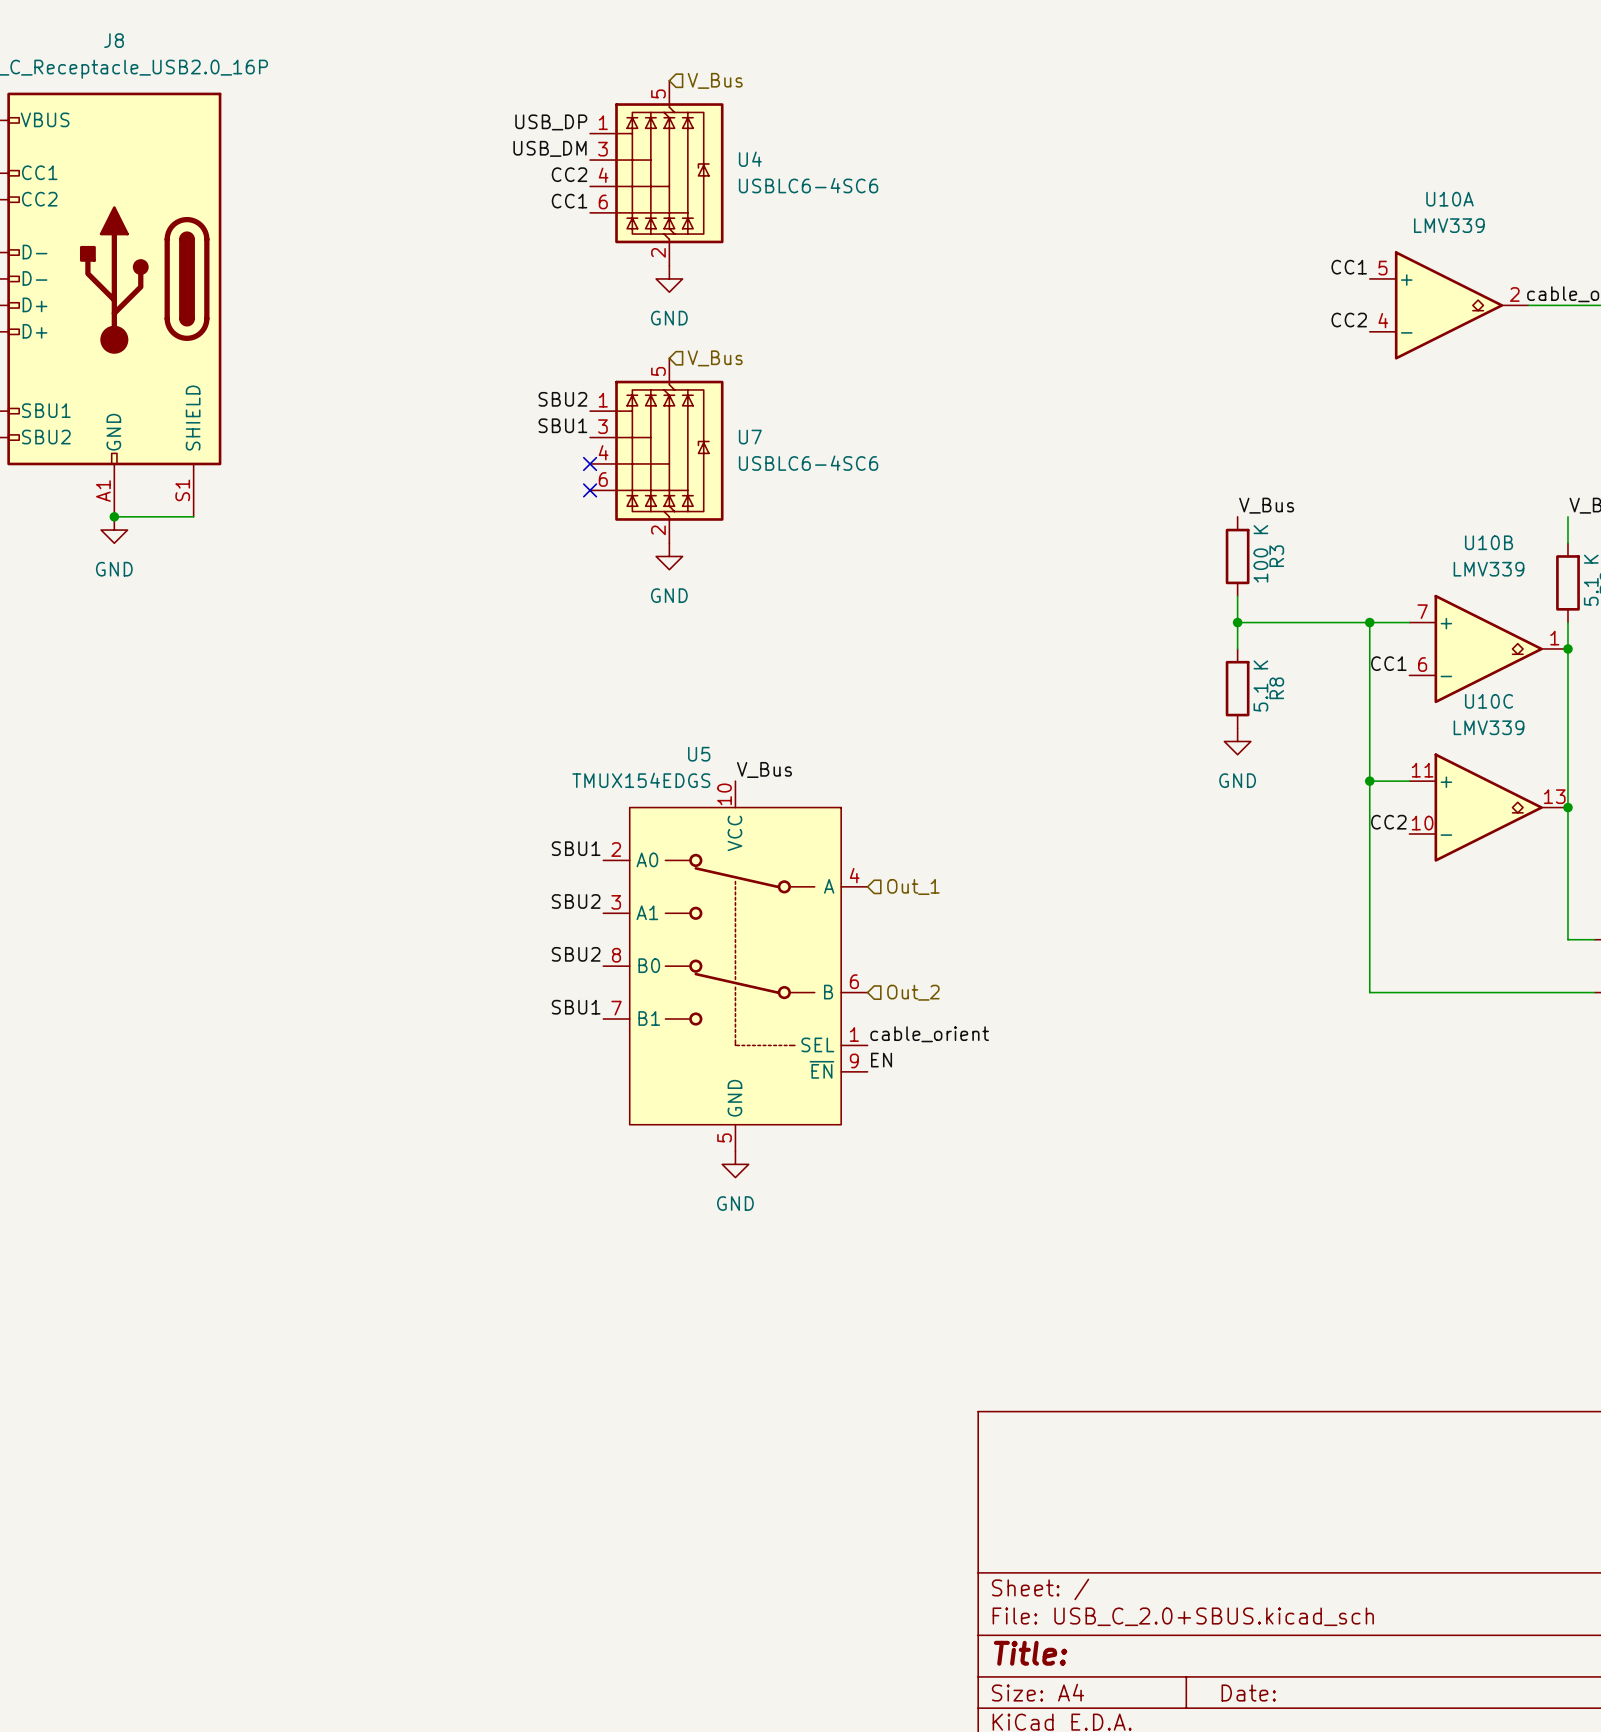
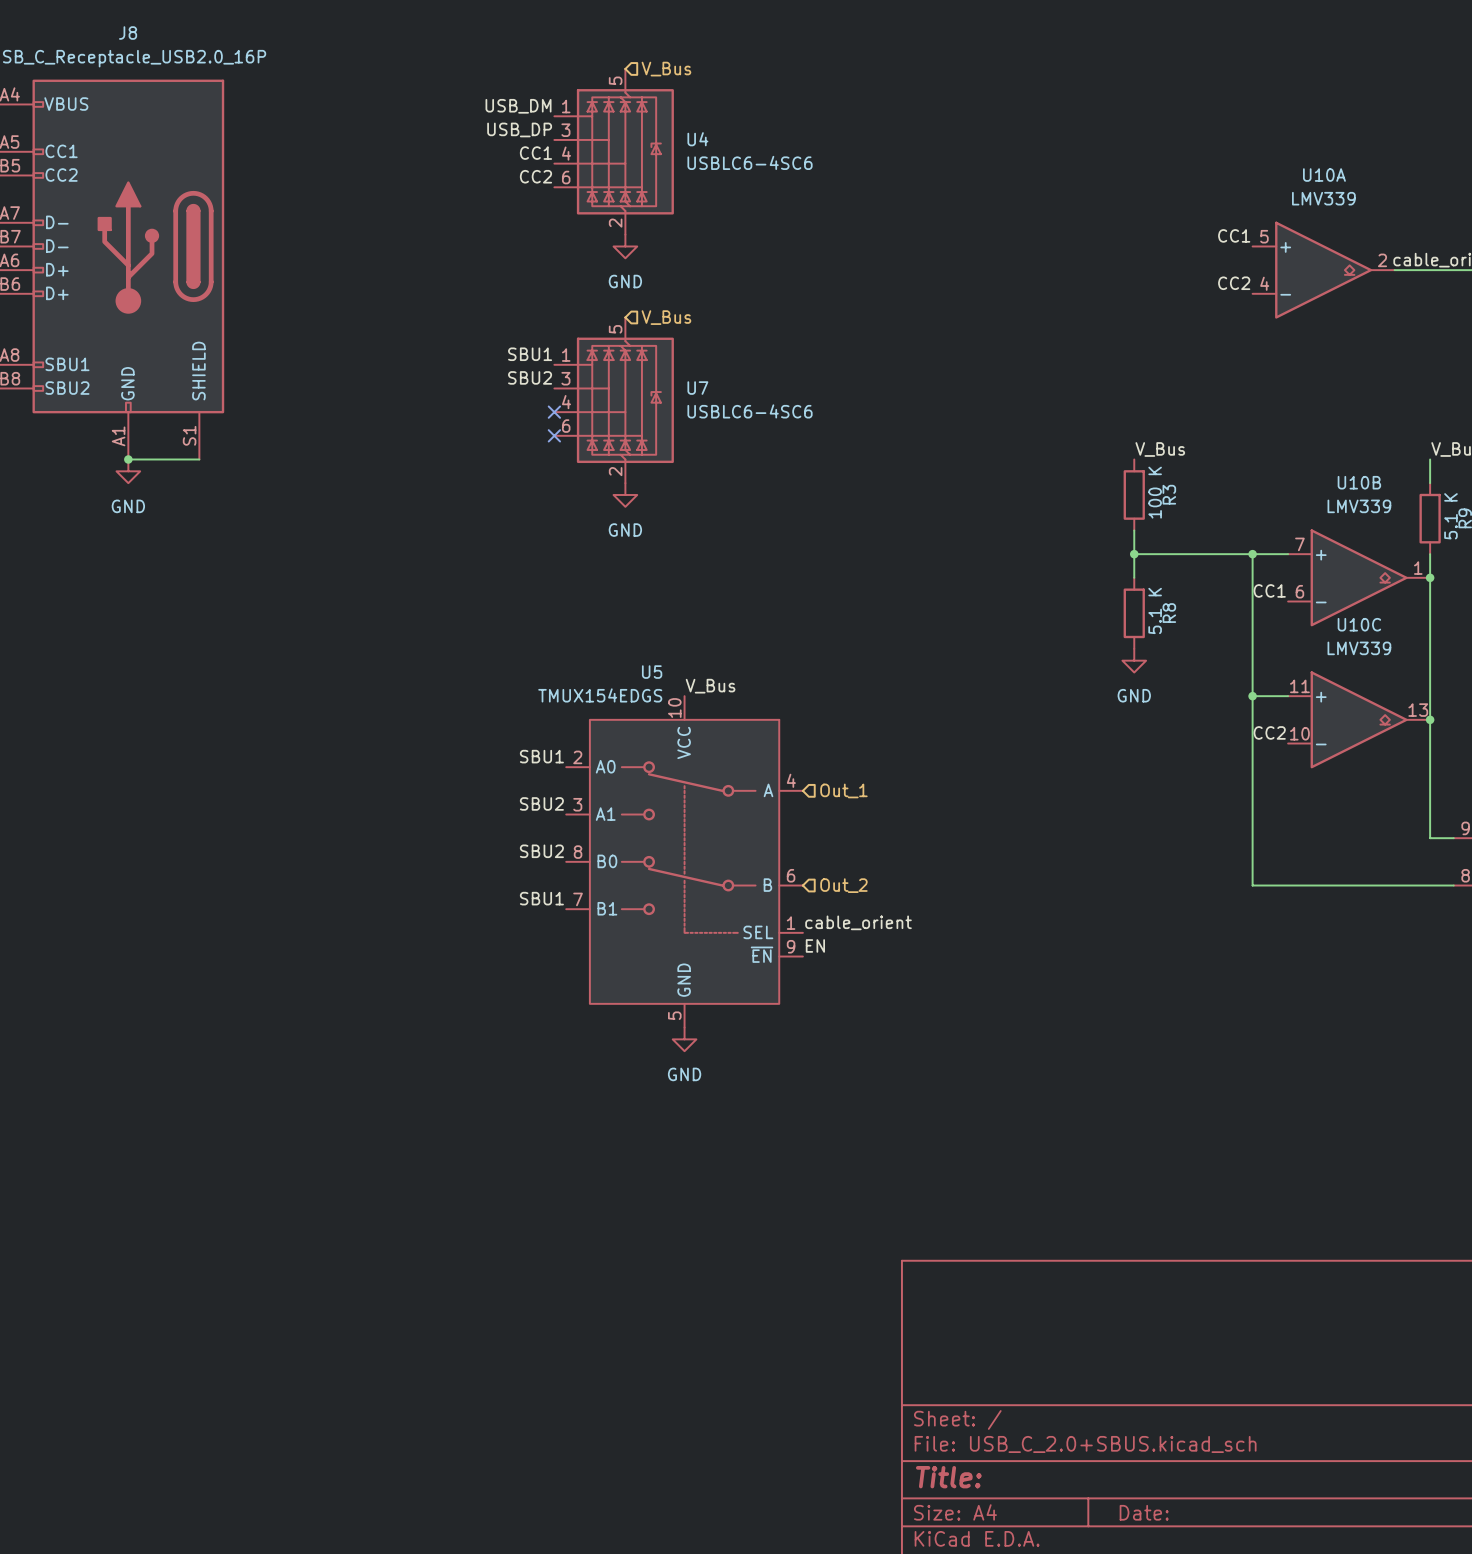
label: USB_DP (551, 122) -> USB_DM (518, 106)
label: USB_DM (550, 148) -> USB_DP (519, 129)
label: CC2 (569, 174) -> CC1 (535, 153)
label: CC1 (569, 201) -> CC2 (535, 176)
label: SBU2 (562, 399) -> SBU1 (530, 354)
label: SBU1 (562, 425) -> SBU2 (530, 377)

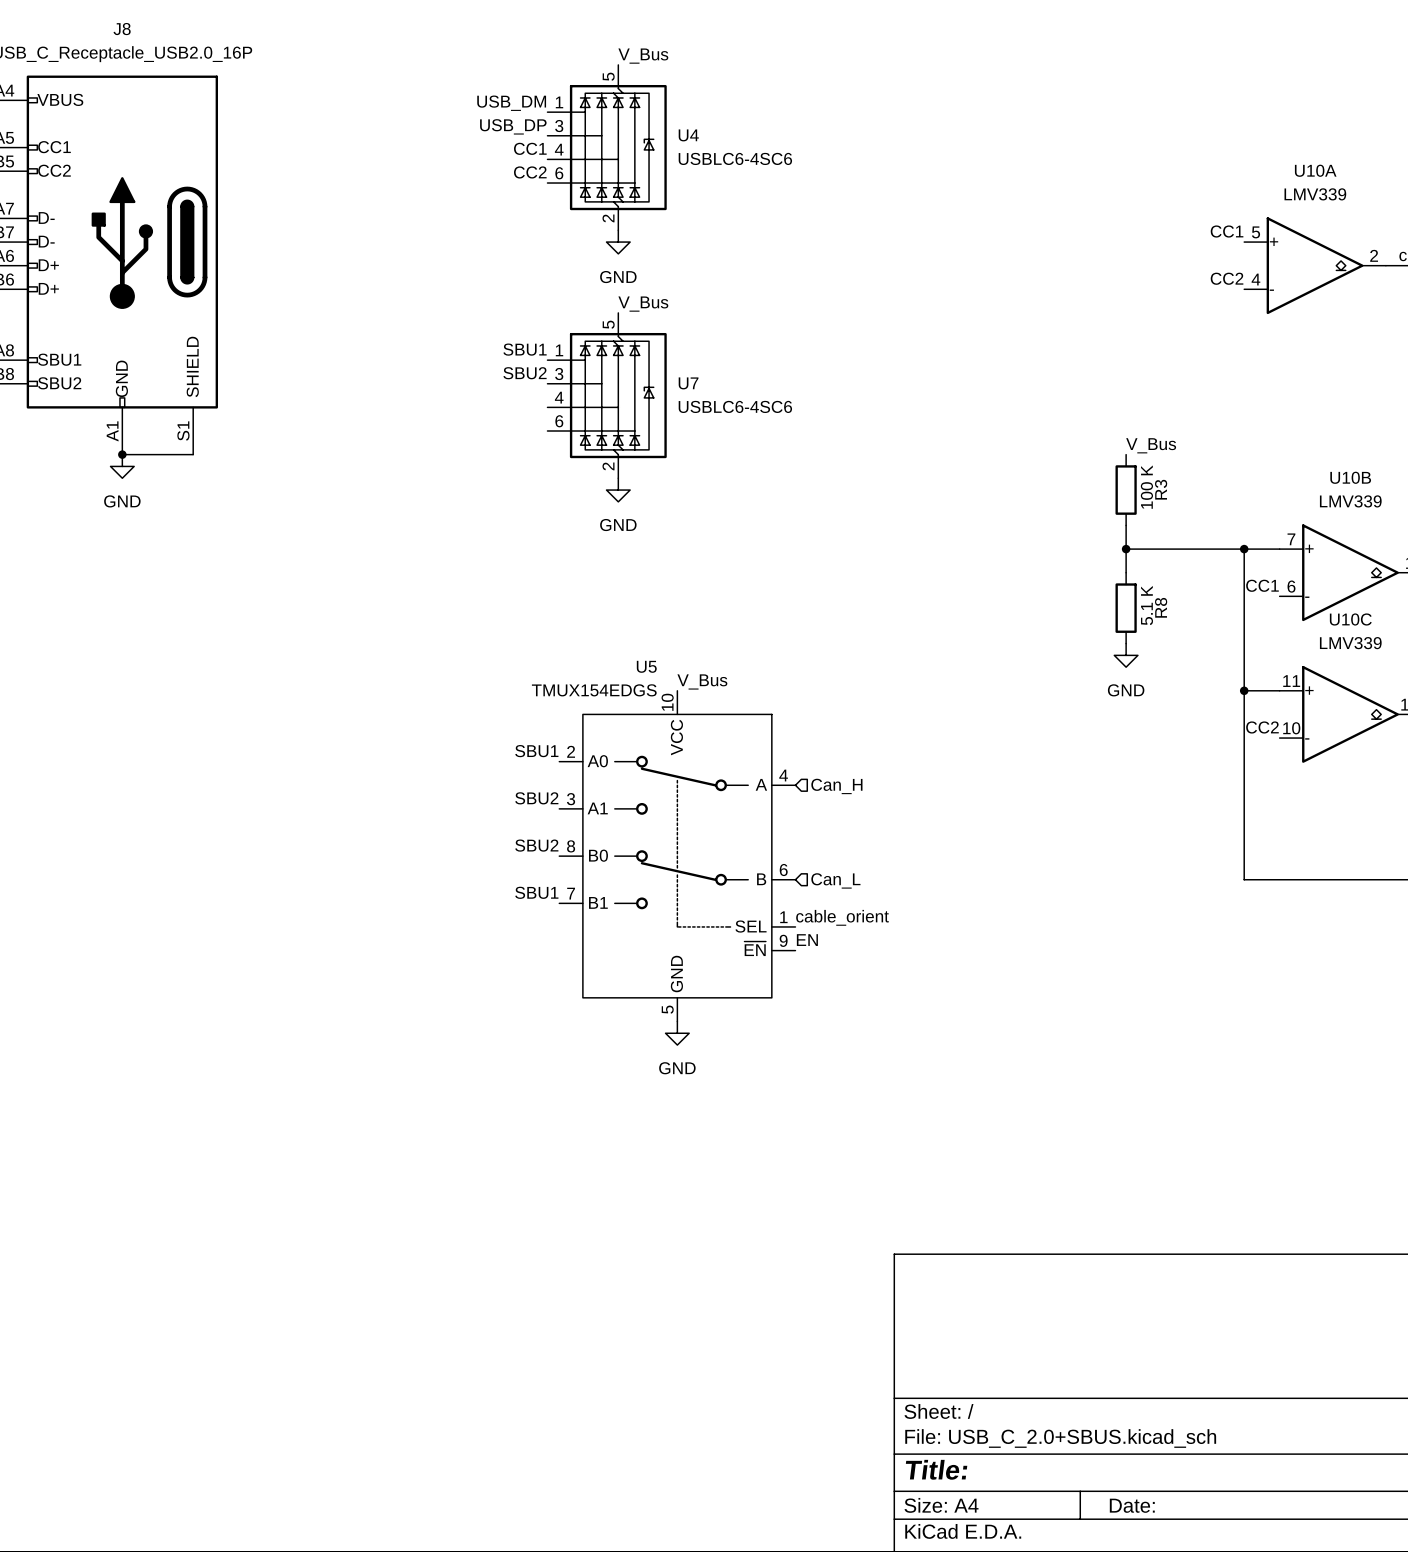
label: none -> V_Bus (643, 56)
hierarchical label: V_Bus (666, 69) -> none
label: none -> V_Bus (643, 304)
hierarchical label: V_Bus (666, 317) -> none
no-connect mark: (554, 412) -> none
no-connect mark: (554, 435) -> none
hierarchical label: Out_1 (843, 790) -> Can_H (836, 786)
hierarchical label: Out_2 (843, 885) -> Can_L (835, 880)

